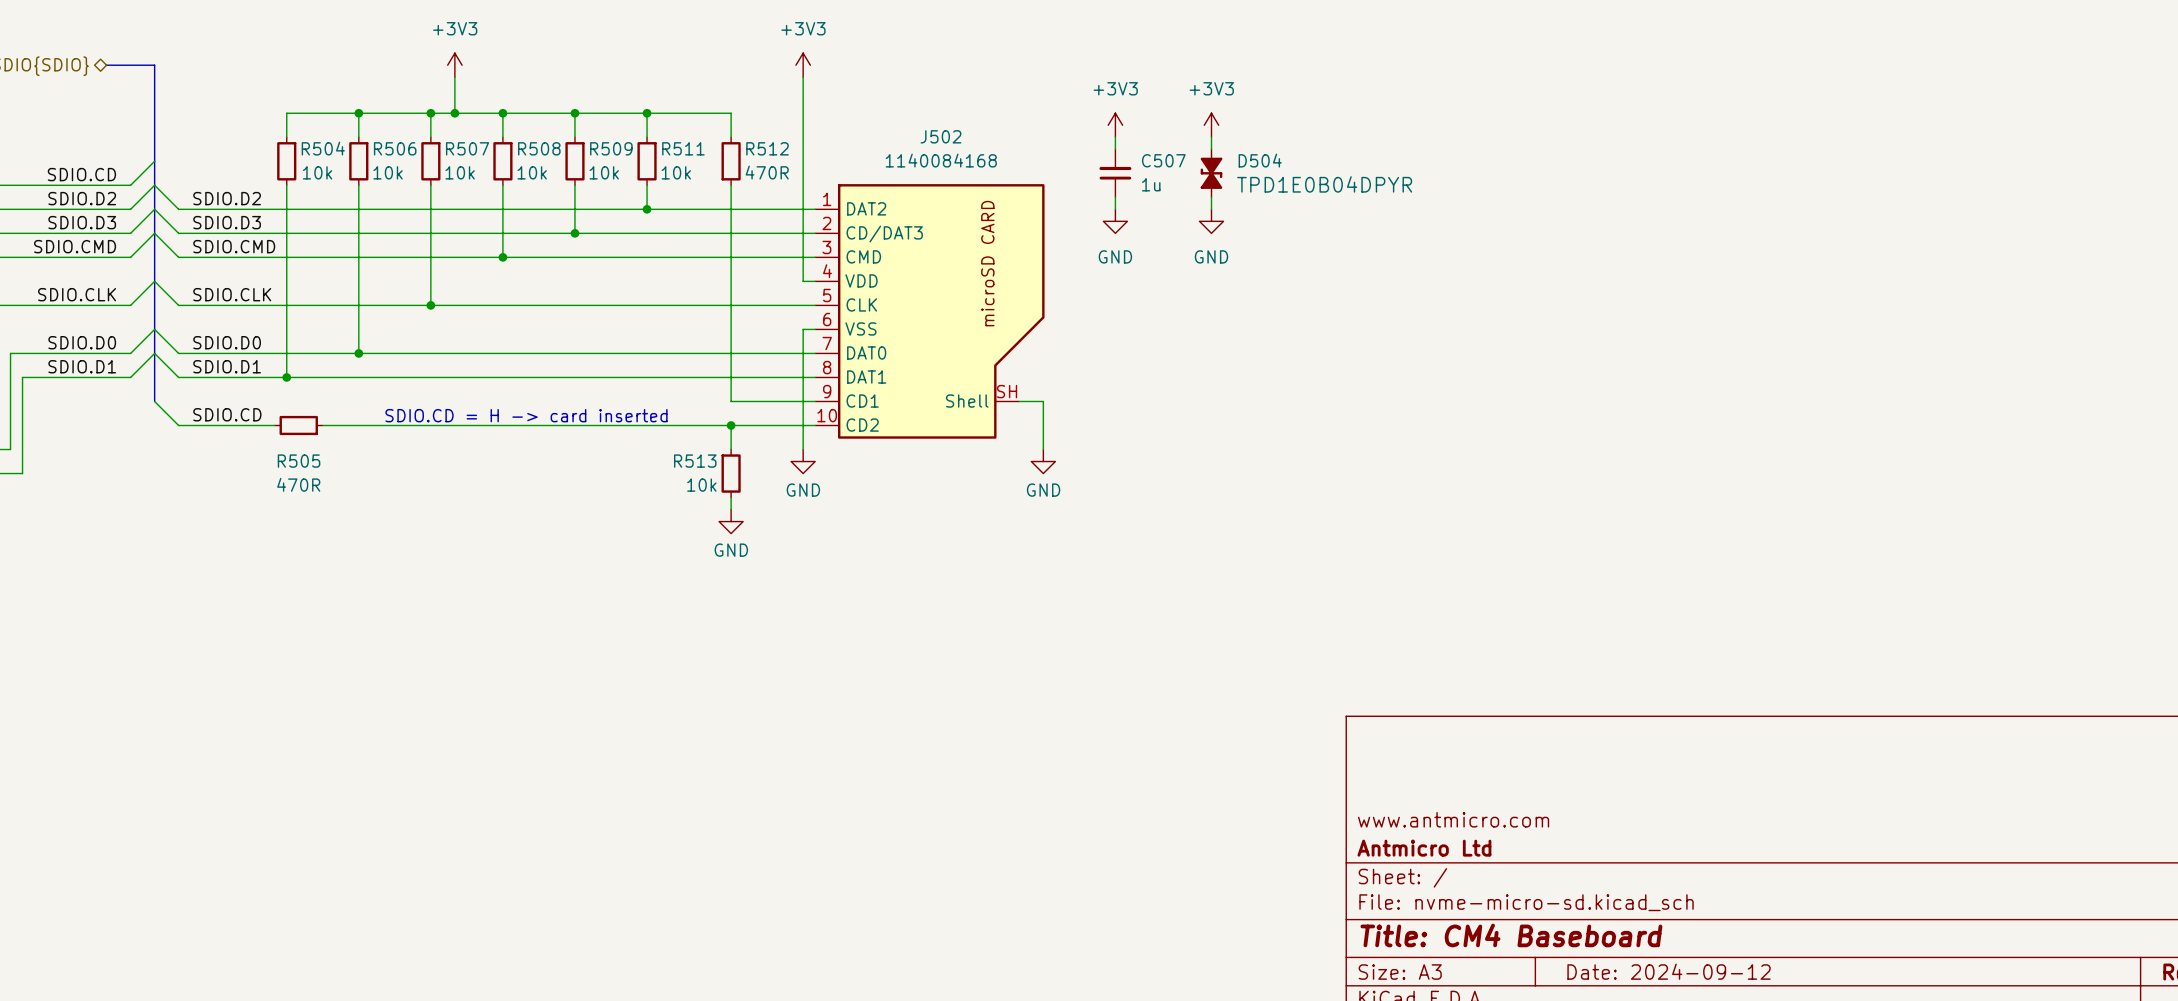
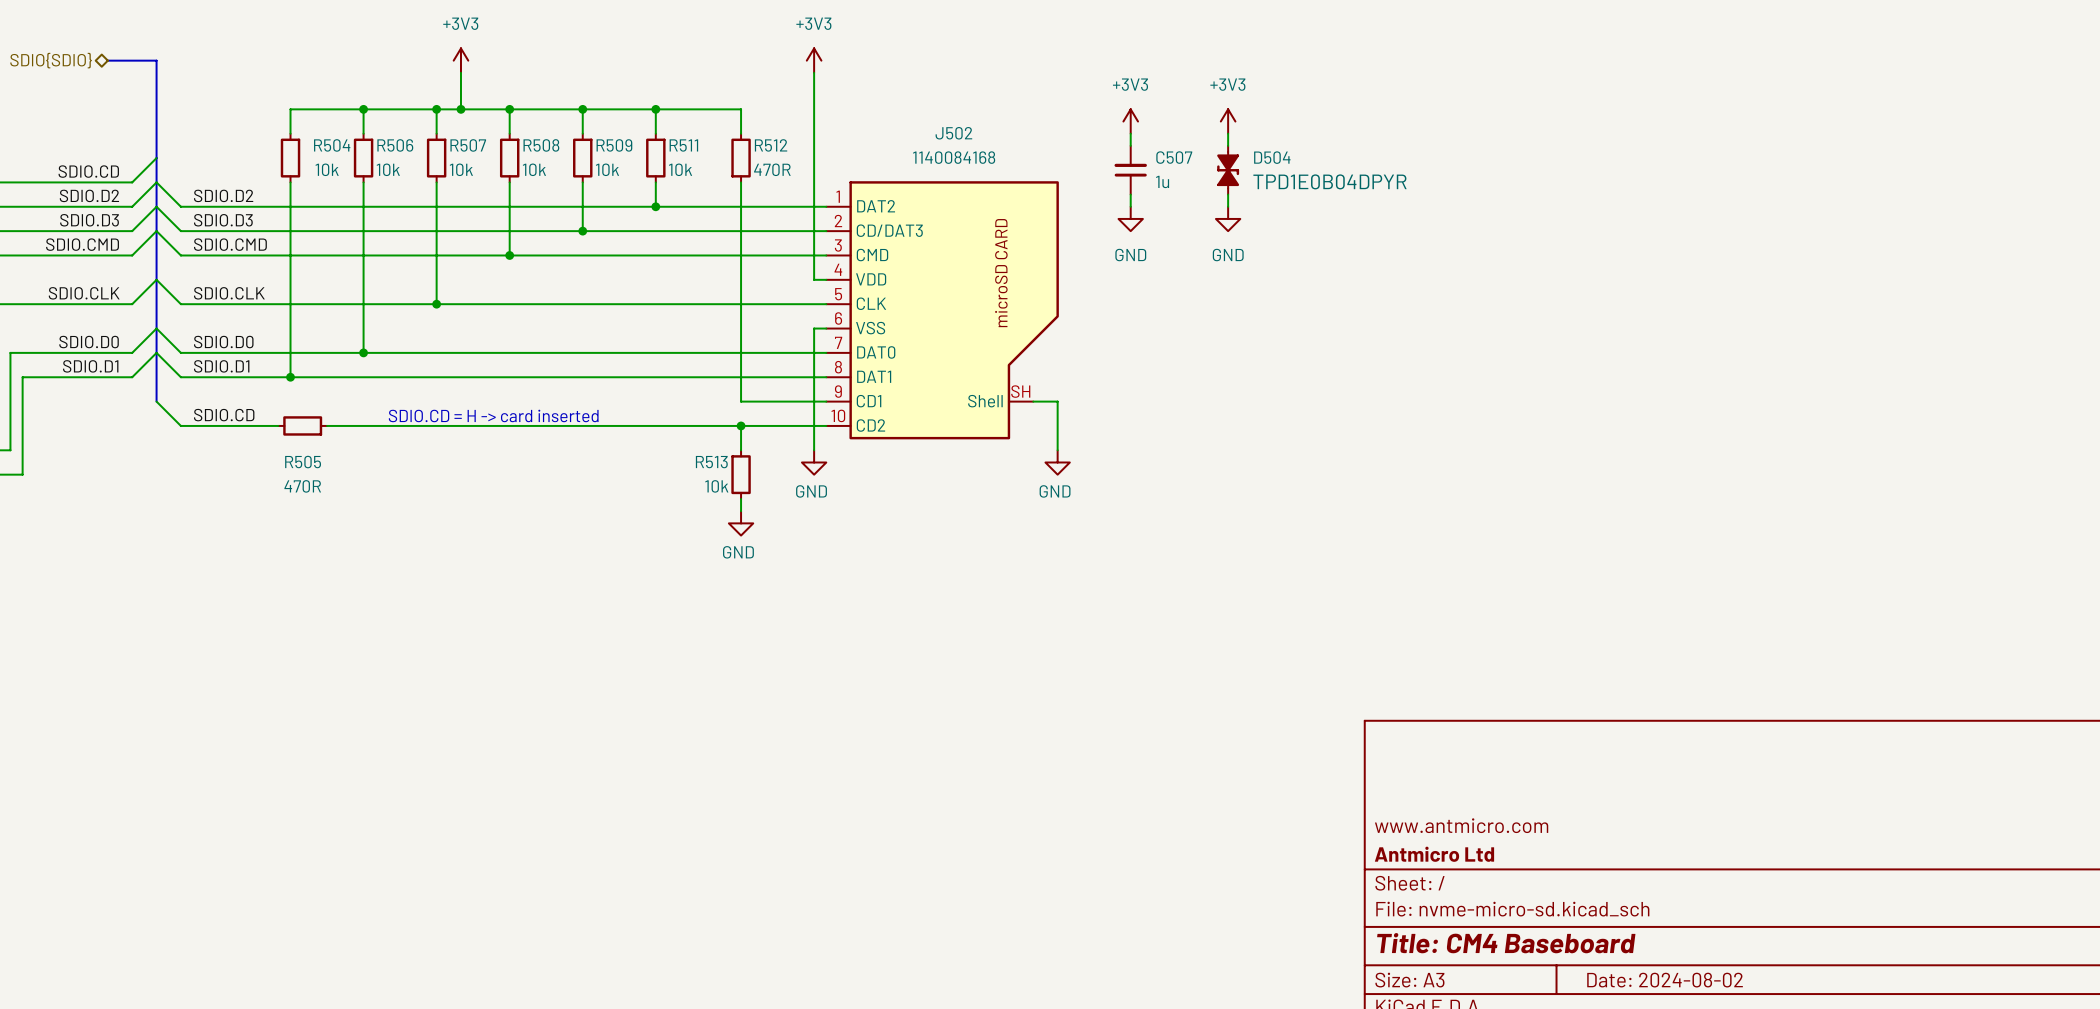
title block: Date: 2024-09-12 (1669, 971) -> Date: 2024-08-02 (1665, 980)

